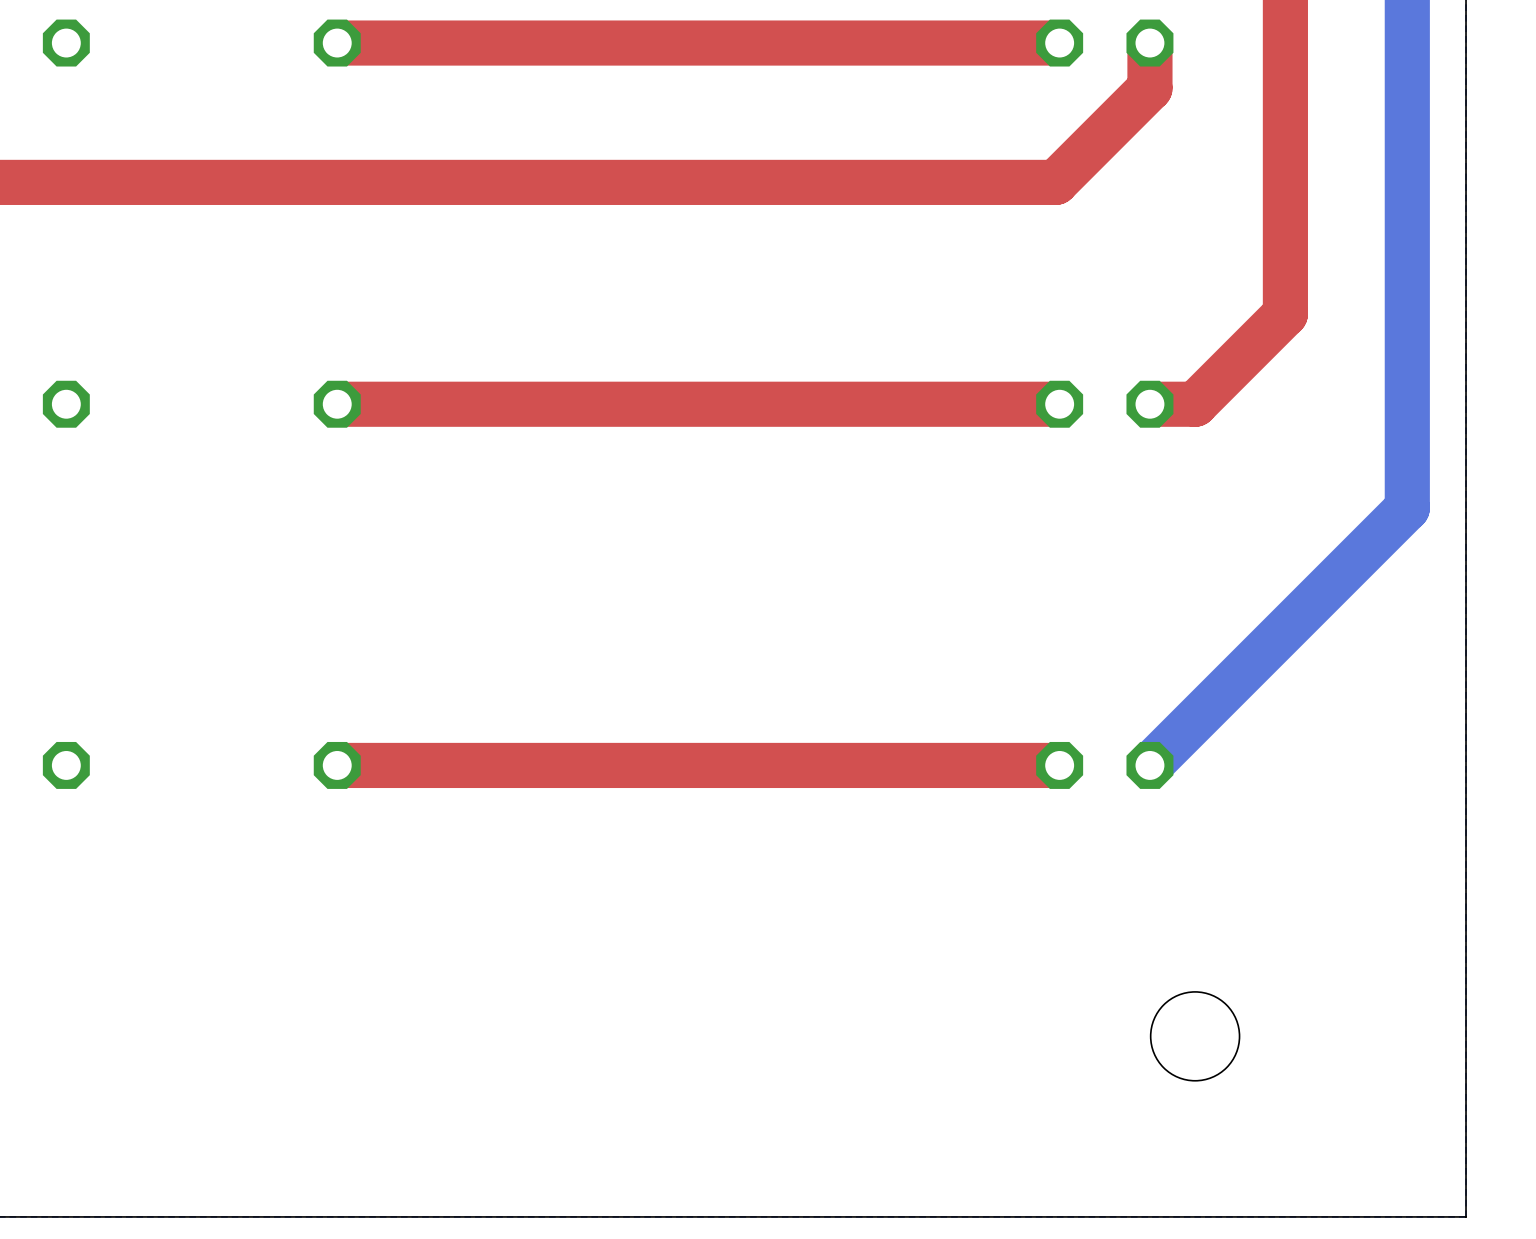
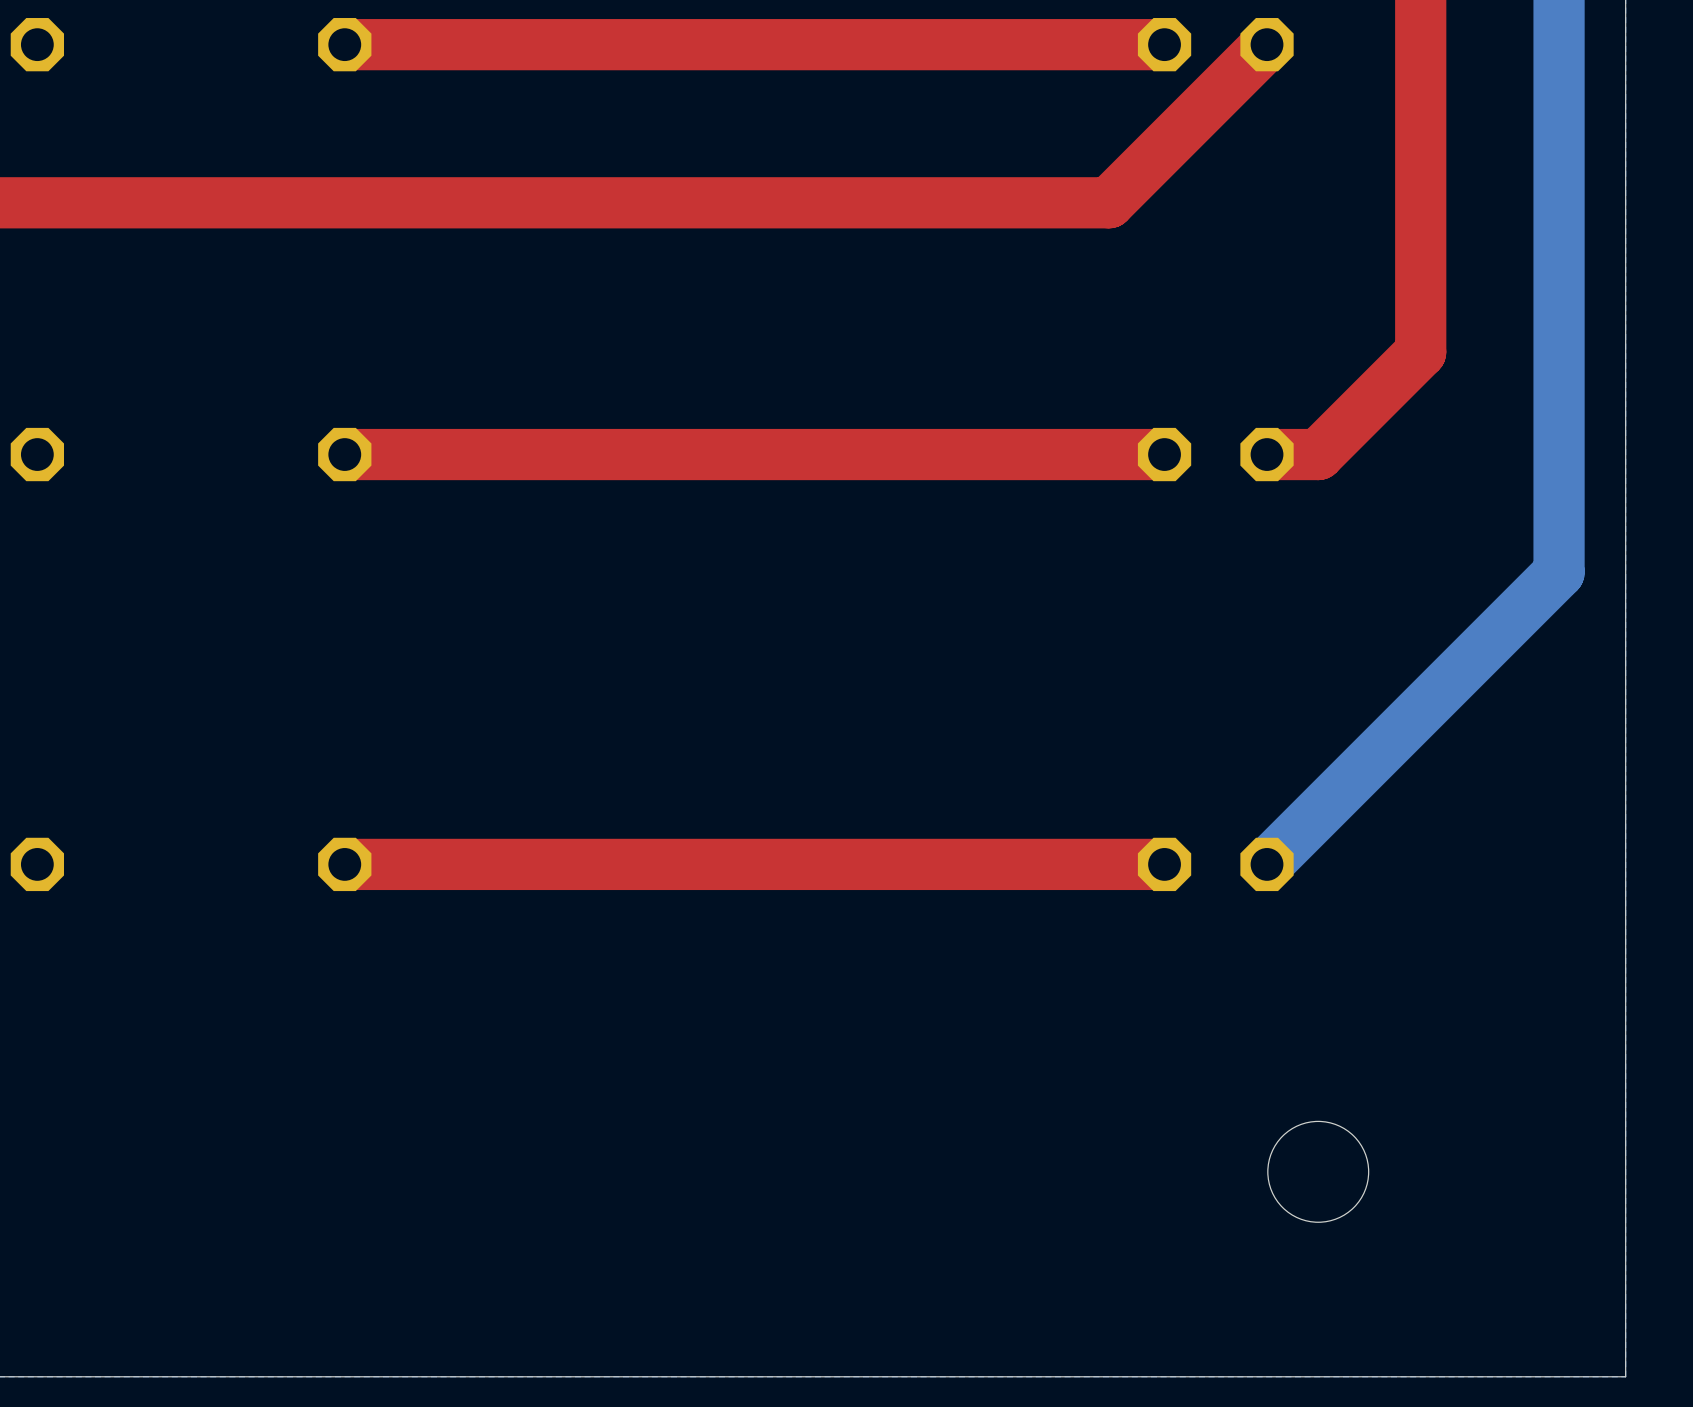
top track: (1149, 43) (1149, 88) (1055, 182) (1010, 182) -> (1267, 44) (1108, 202)

